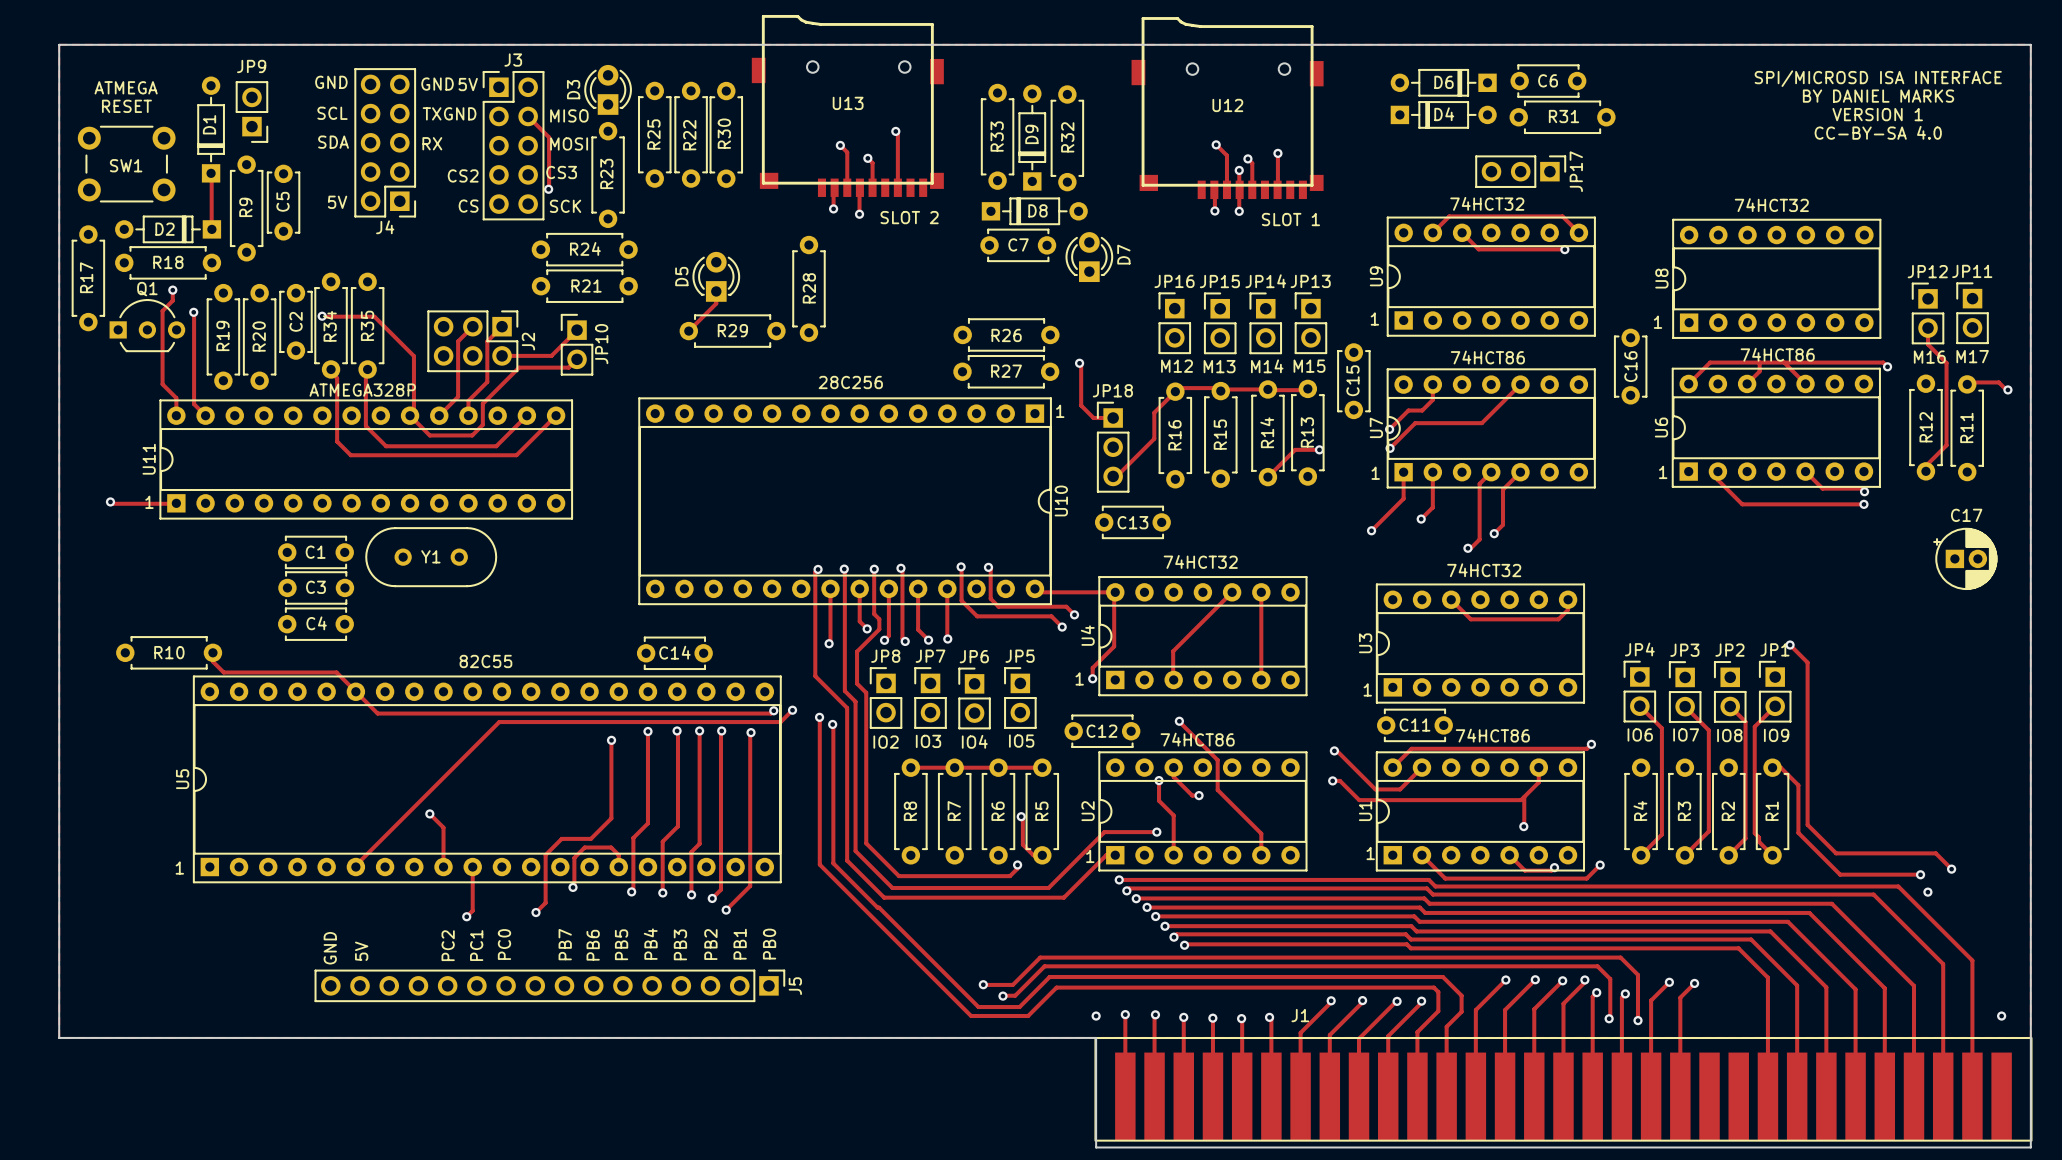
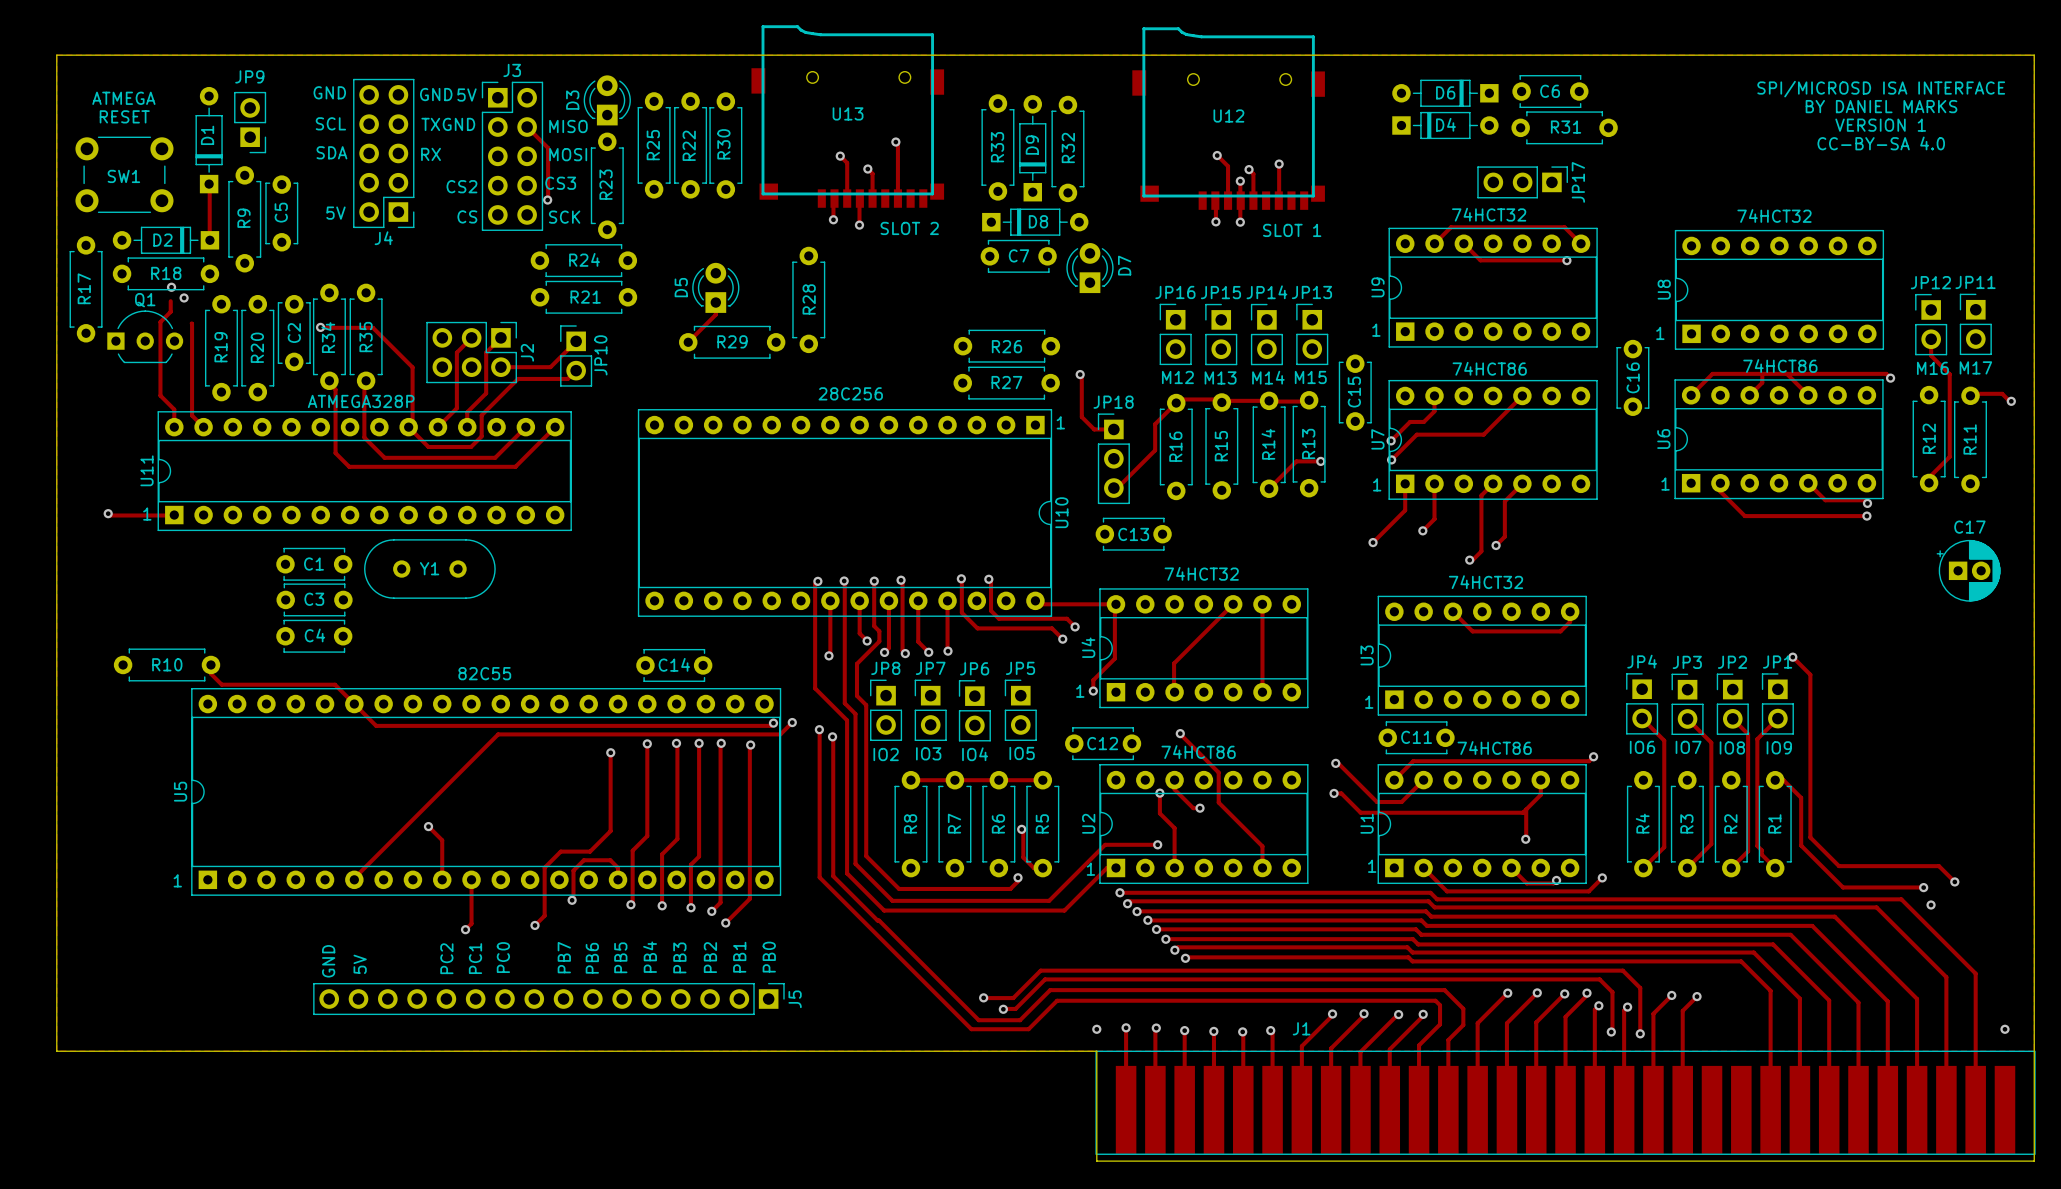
via: none -> (171, 287)
via: none -> (184, 297)
via: (172, 290) -> none
via: (193, 312) -> none

